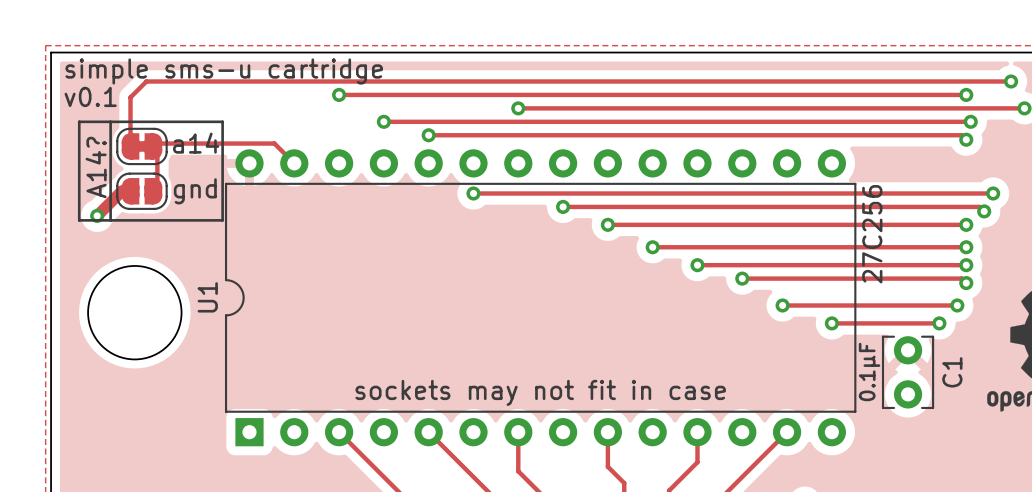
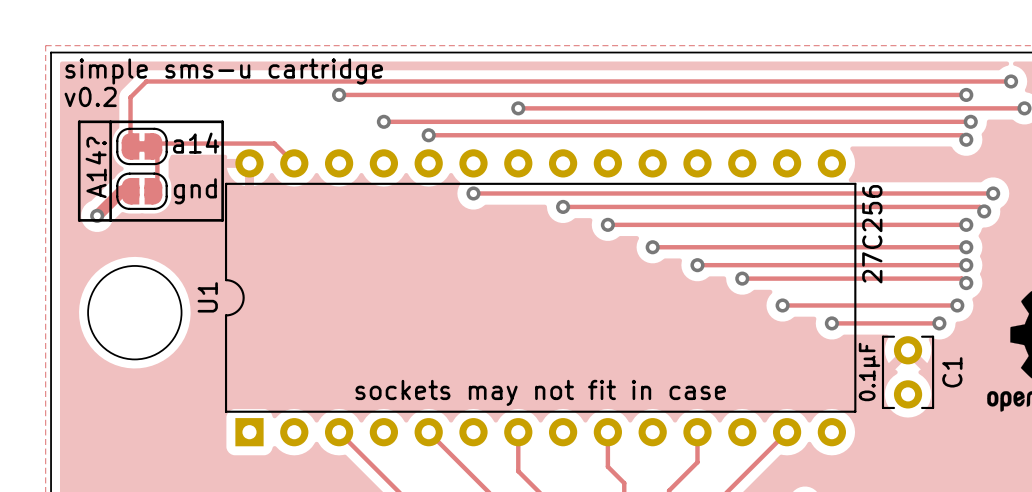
text: v0.1 (90, 96) -> v0.2 (90, 96)

